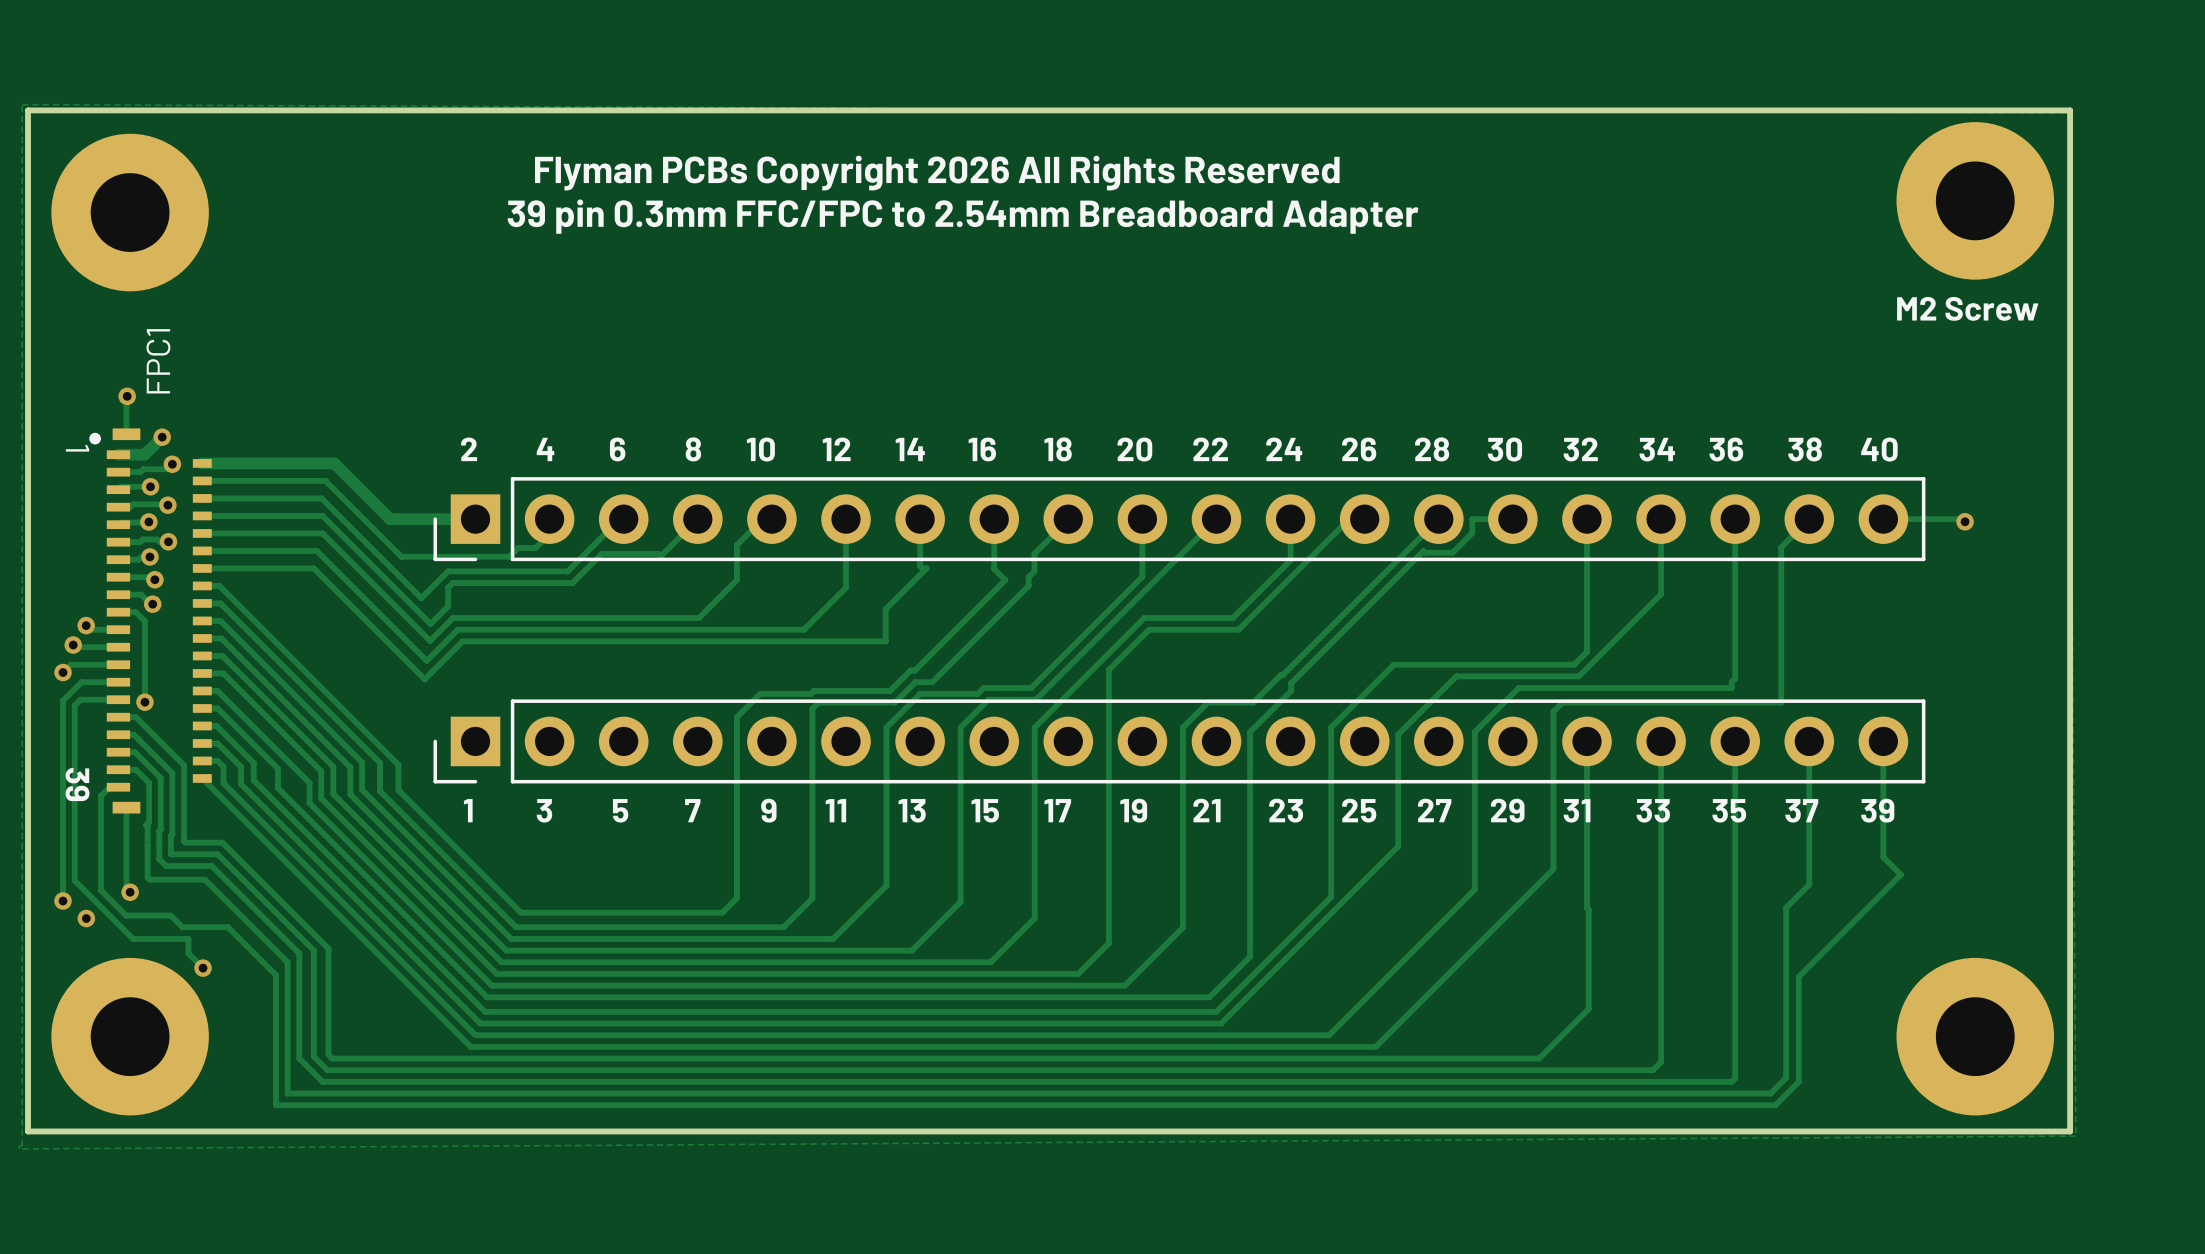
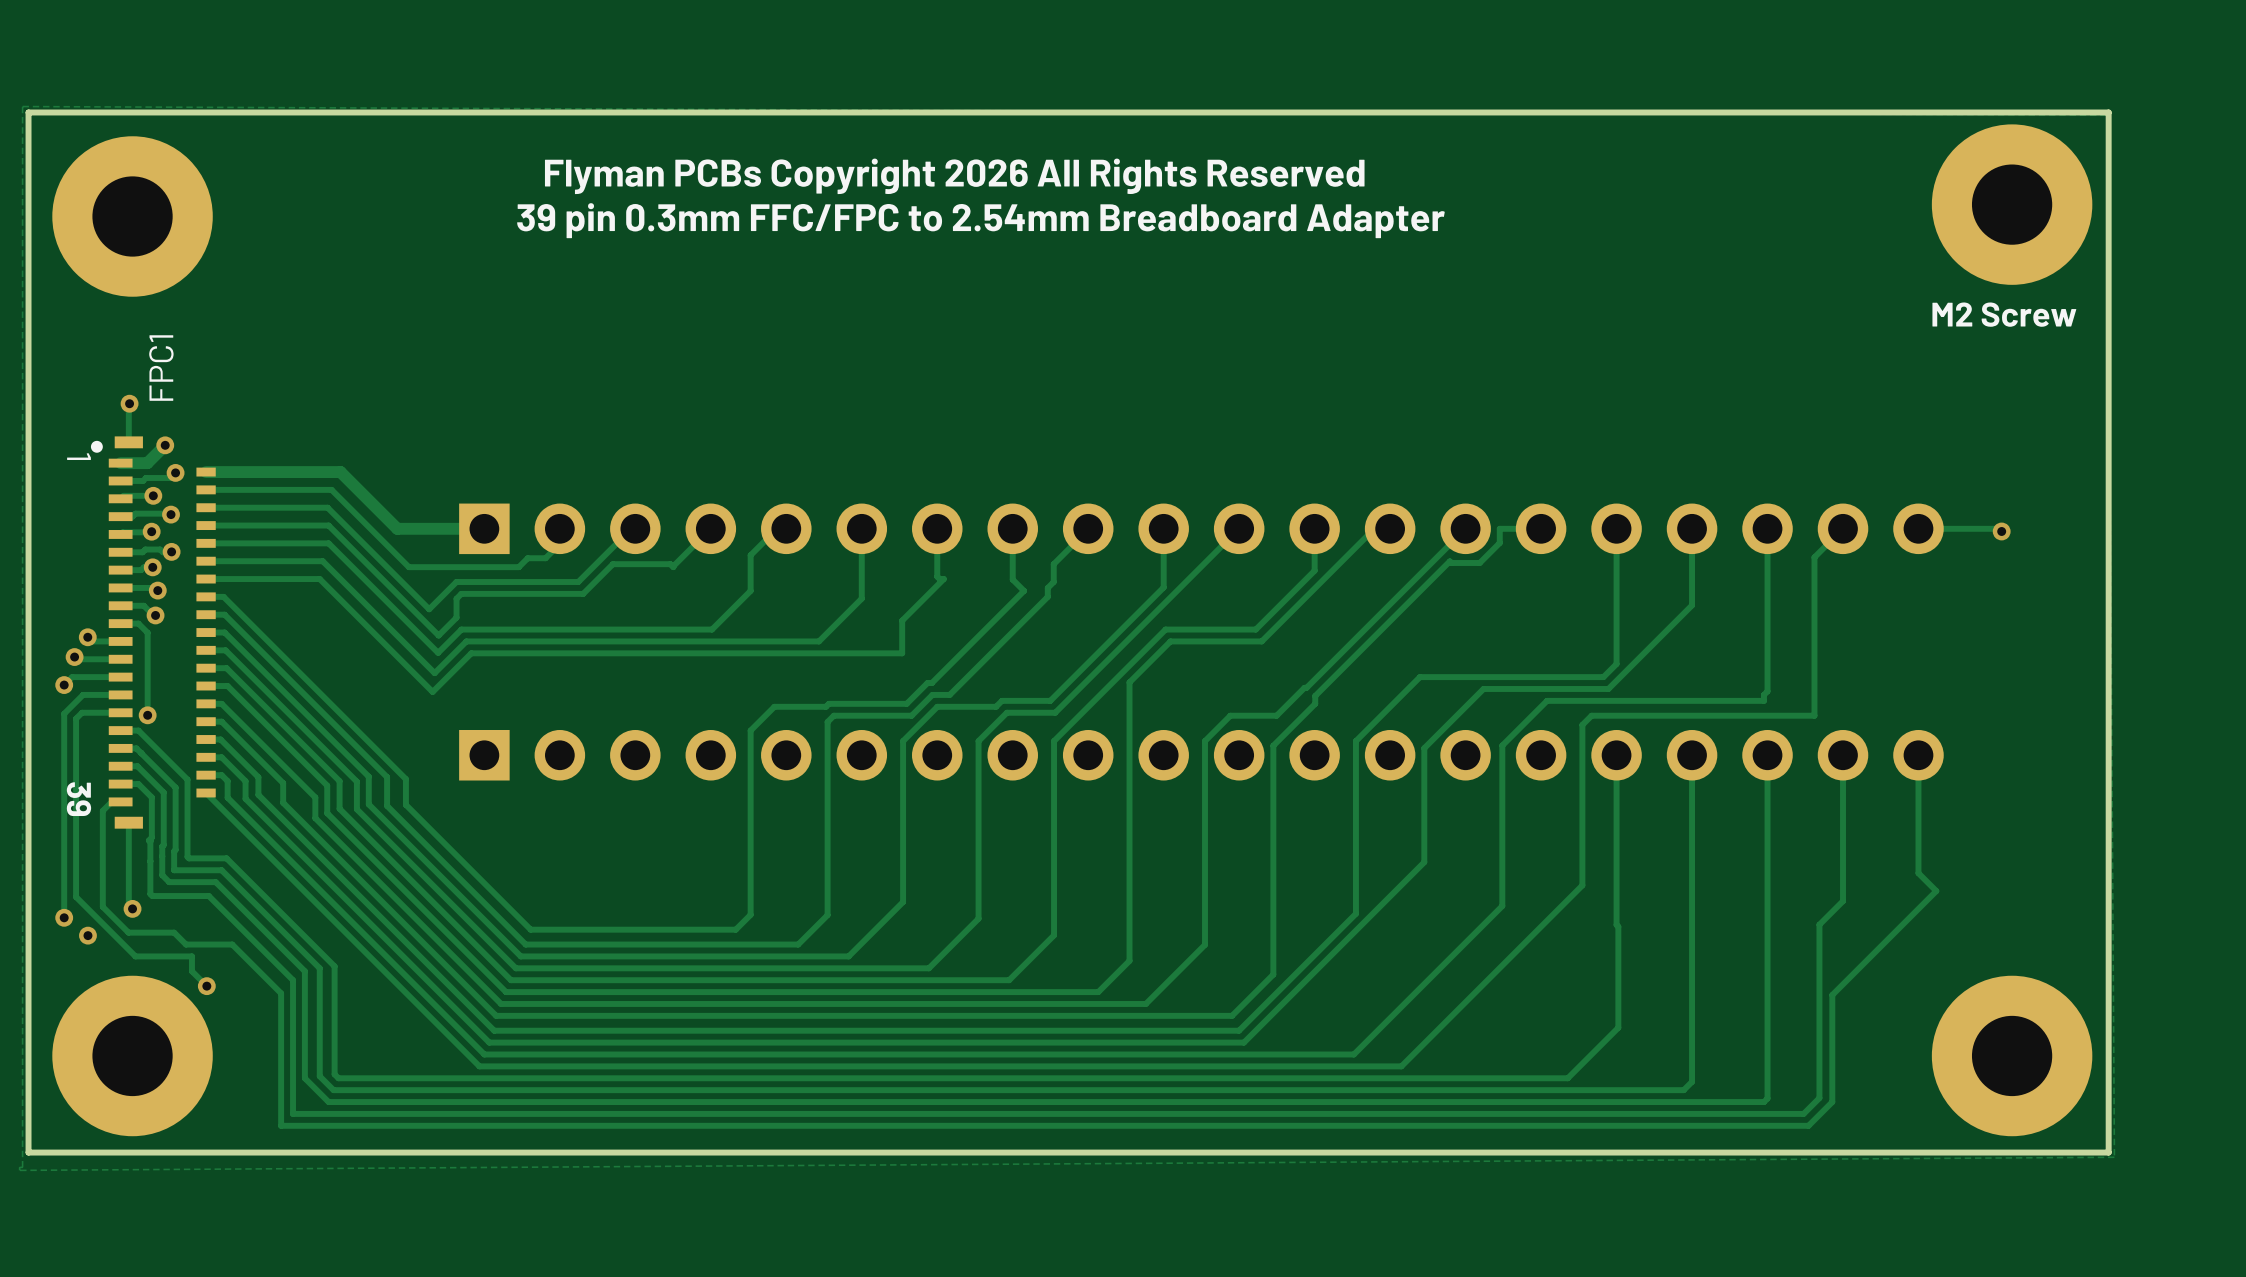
text: 2 (469, 449) -> none
text: 4 (545, 449) -> none
text: 6 (617, 449) -> none
text: 8 (693, 449) -> none
text: 10 (760, 449) -> none
text: 12 (836, 449) -> none
text: 14 (910, 449) -> none
text: 16 (982, 449) -> none
text: 18 (1058, 449) -> none
text: 20 (1134, 449) -> none
text: 22 (1210, 449) -> none
text: 24 (1284, 449) -> none
text: 26 (1359, 449) -> none
text: 28 (1432, 449) -> none
text: 30 (1504, 449) -> none
text: 32 (1580, 449) -> none
text: 34 (1657, 449) -> none
text: 36 (1726, 449) -> none
text: 38 (1805, 449) -> none
text: 40 (1879, 449) -> none
part side: top (1179, 519) -> bottom (1201, 528)
part side: top (1179, 741) -> bottom (1201, 755)
text: 1 (468, 810) -> none
text: 3 (544, 810) -> none
text: 5 (620, 810) -> none
text: 7 (692, 810) -> none
text: 9 (768, 810) -> none
text: 11 (835, 810) -> none
text: 13 (912, 810) -> none
text: 15 (985, 810) -> none
text: 17 (1057, 810) -> none
text: 19 (1133, 810) -> none
text: 21 (1206, 810) -> none
text: 23 (1286, 810) -> none
text: 25 (1359, 810) -> none
text: 27 (1434, 810) -> none
text: 29 (1507, 810) -> none
text: 31 (1577, 810) -> none
text: 33 (1653, 810) -> none
text: 35 (1729, 810) -> none
text: 37 (1801, 810) -> none
text: 39 (1877, 810) -> none

